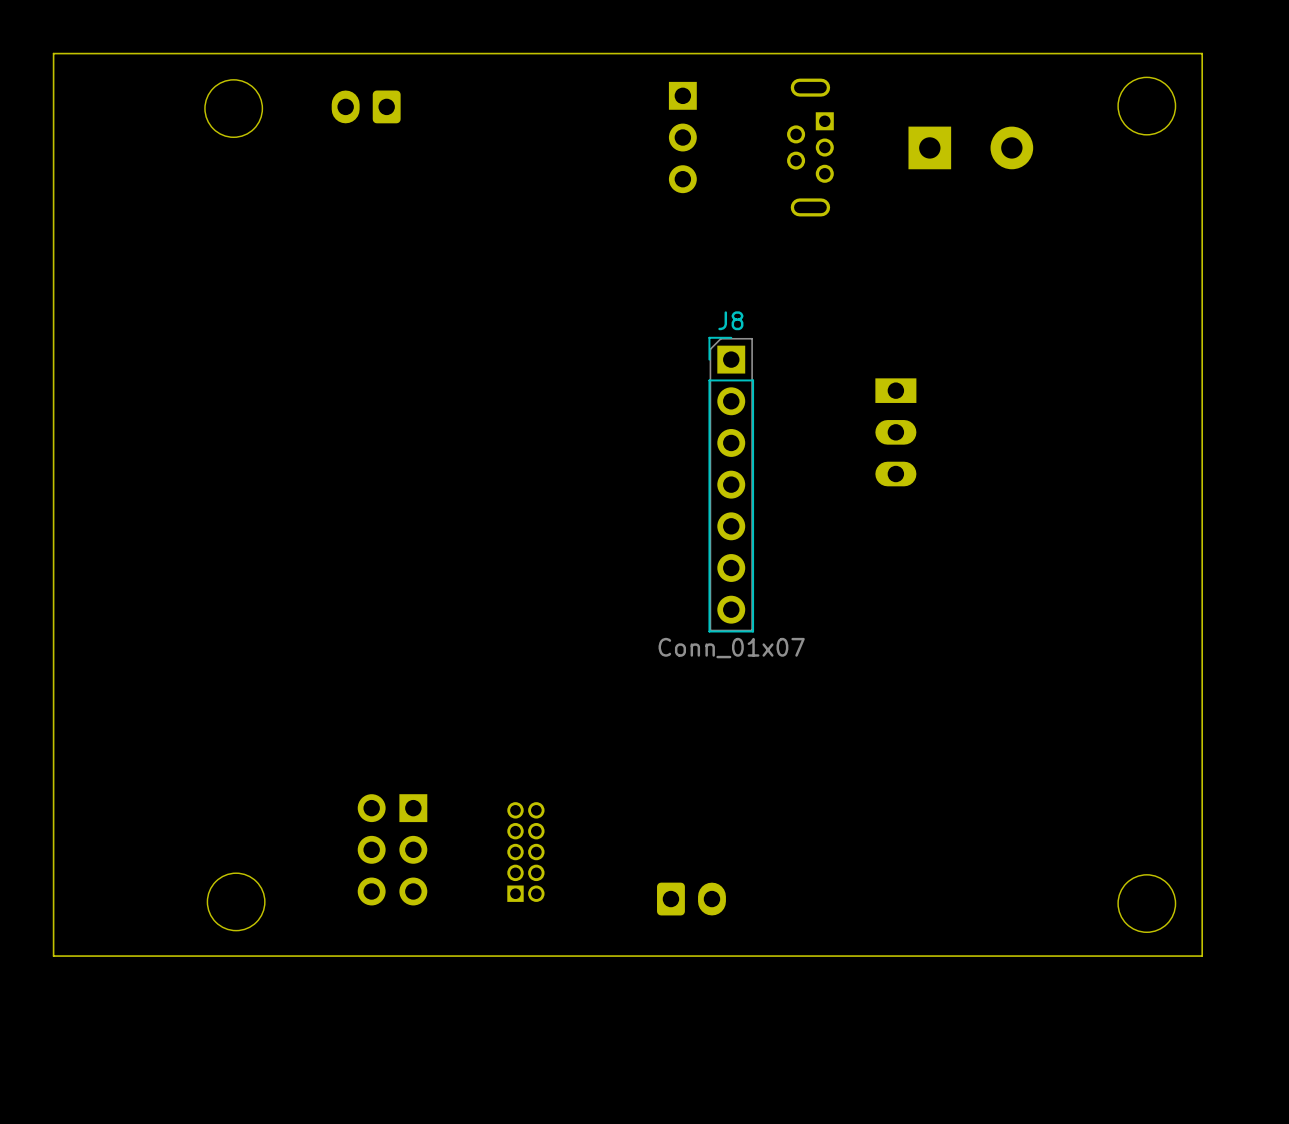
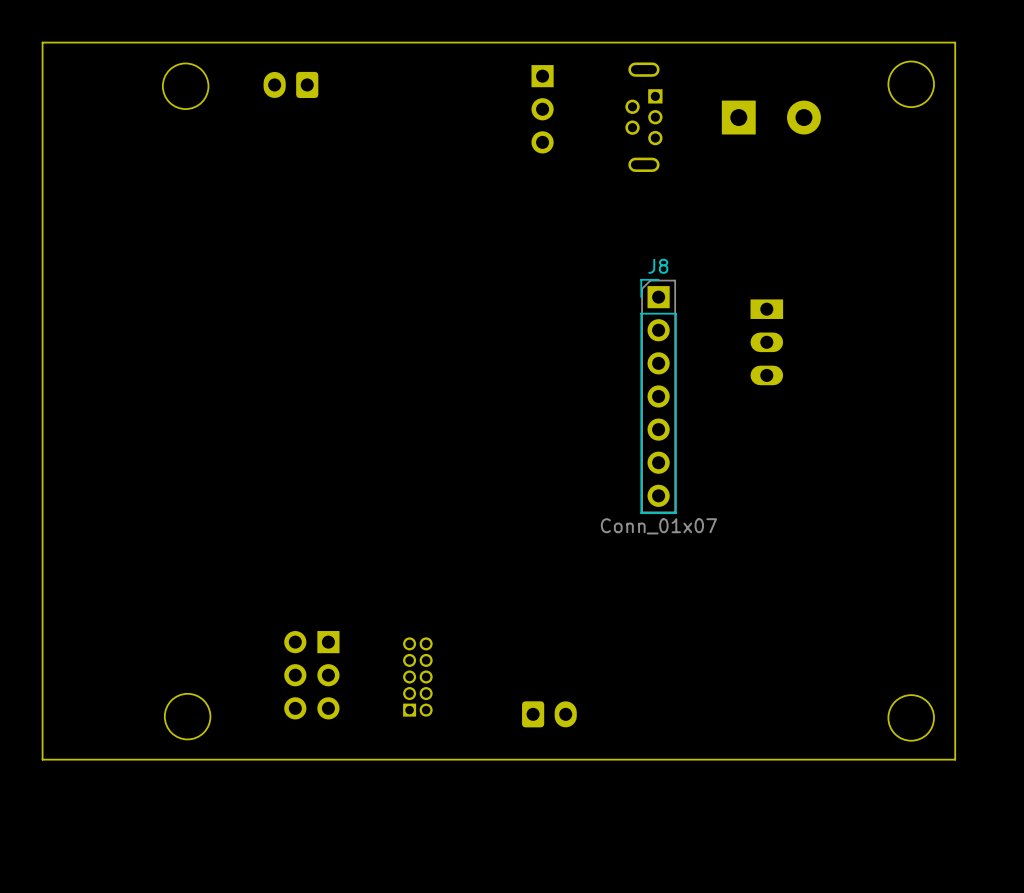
part position: (895, 432) -> (766, 342)
J8 position: (731, 484) -> (658, 396)

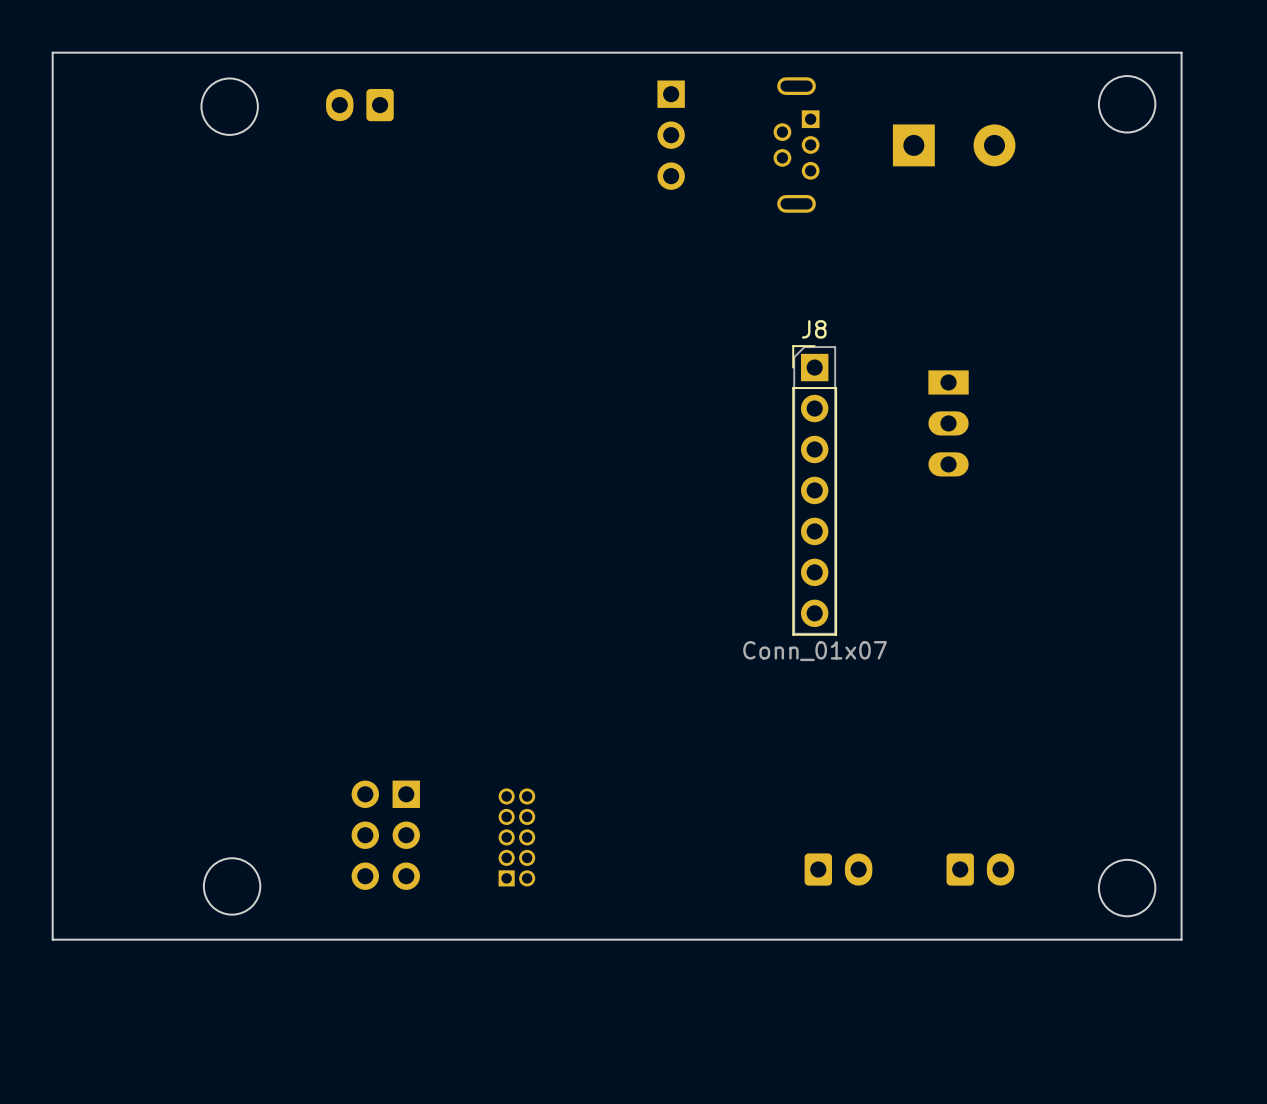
part: none -> (838, 869)
part: none -> (980, 869)
part: (549, 714) -> none

